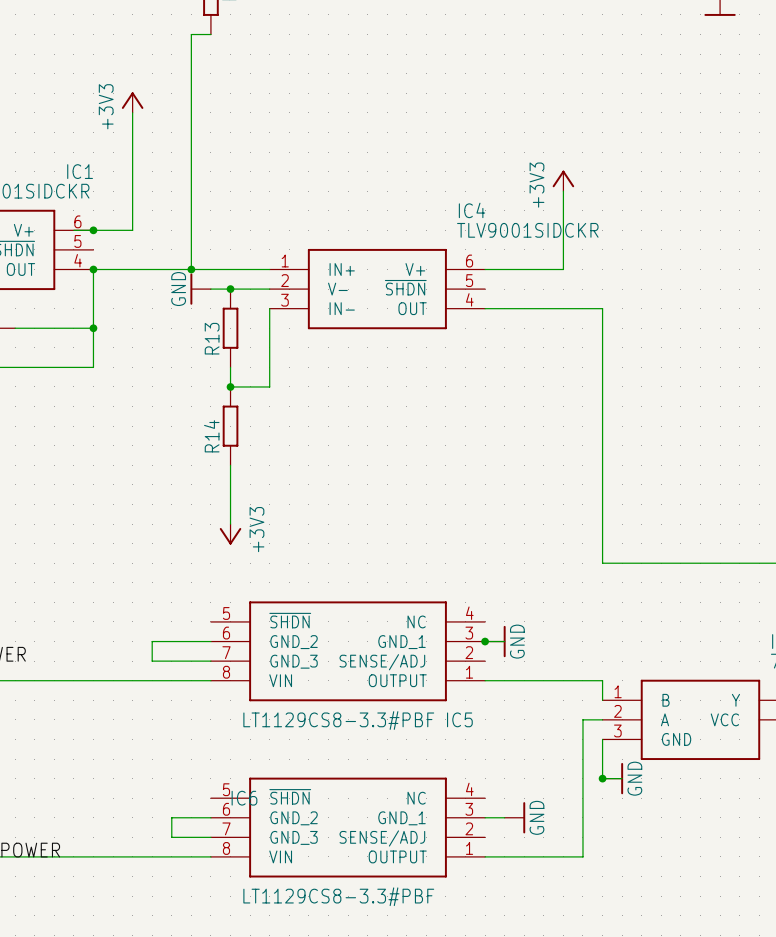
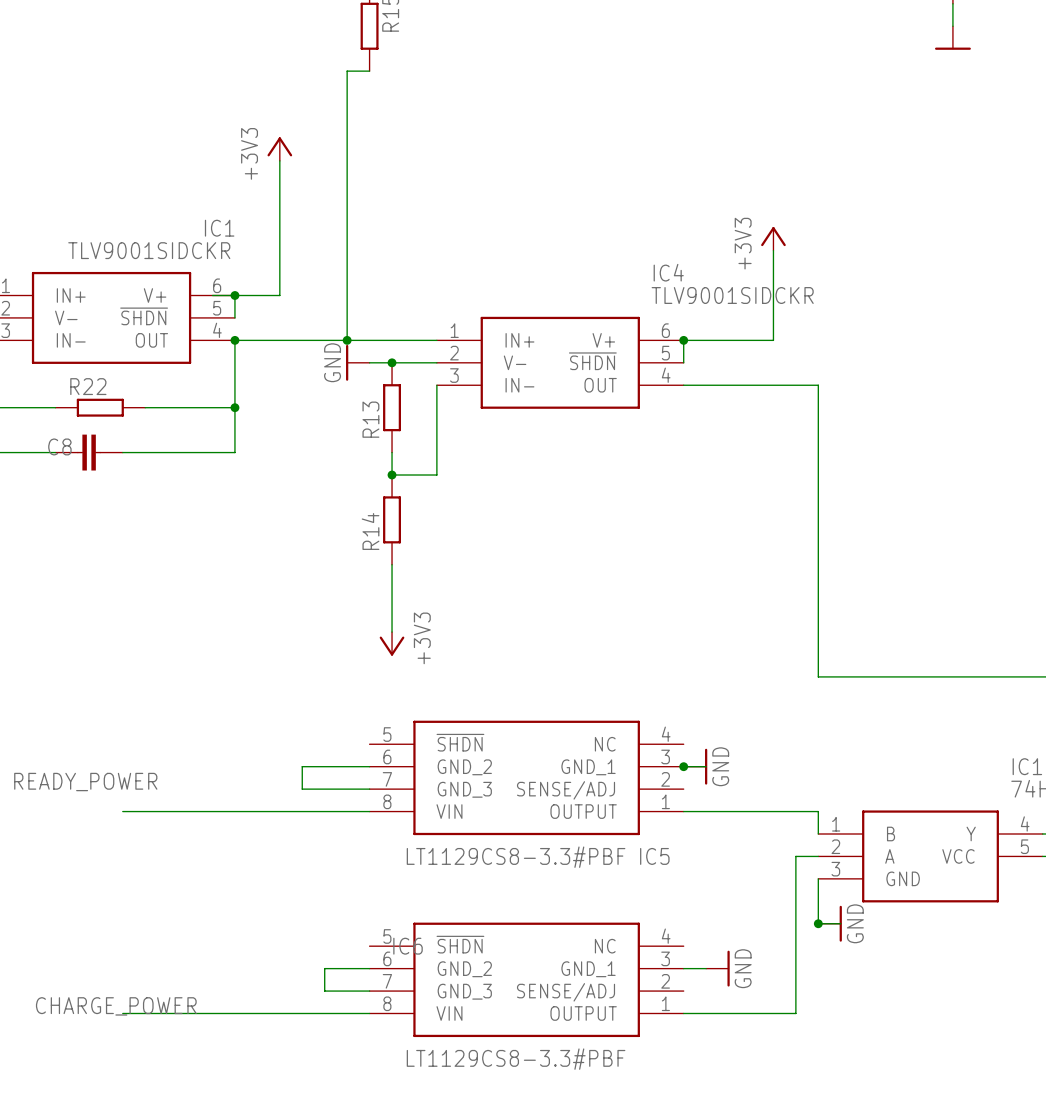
wire: none -> (234, 295) (234, 317)
wire: none -> (683, 340) (683, 362)
junction: none -> (683, 340)

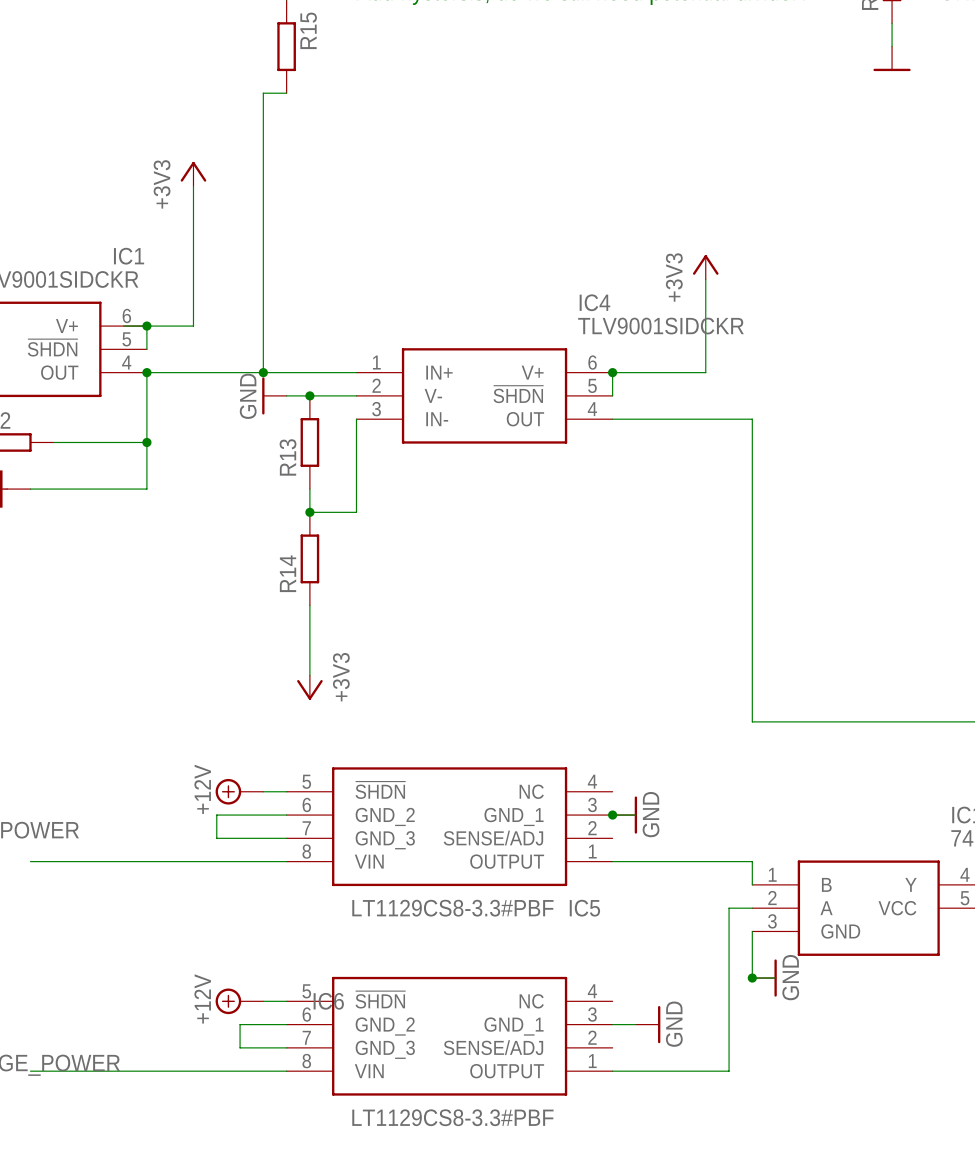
power symbol: none -> +12V (239, 791)
wire: none -> (263, 791) (286, 791)
power symbol: none -> +12V (239, 1001)
wire: none -> (263, 1001) (286, 1001)

